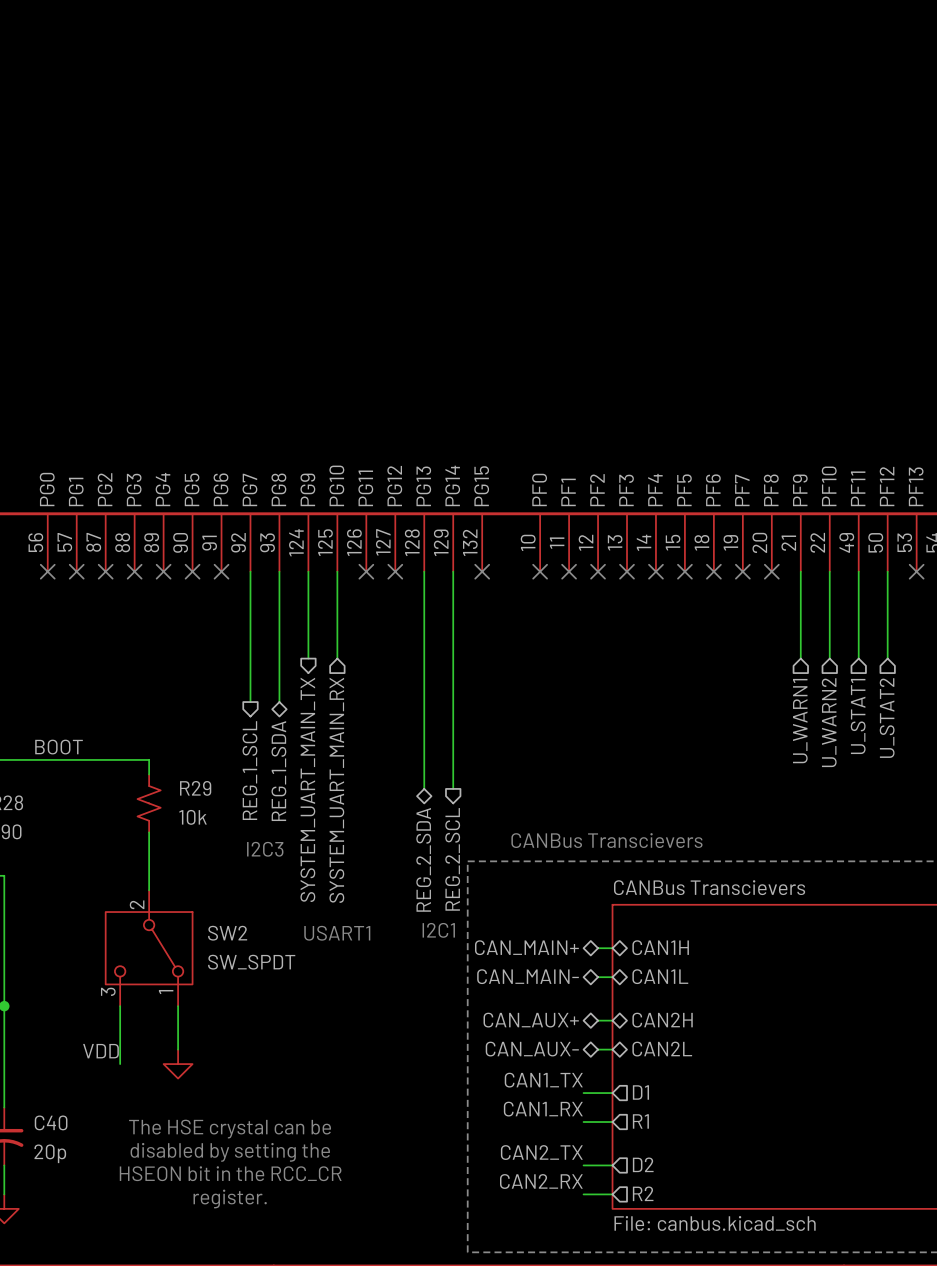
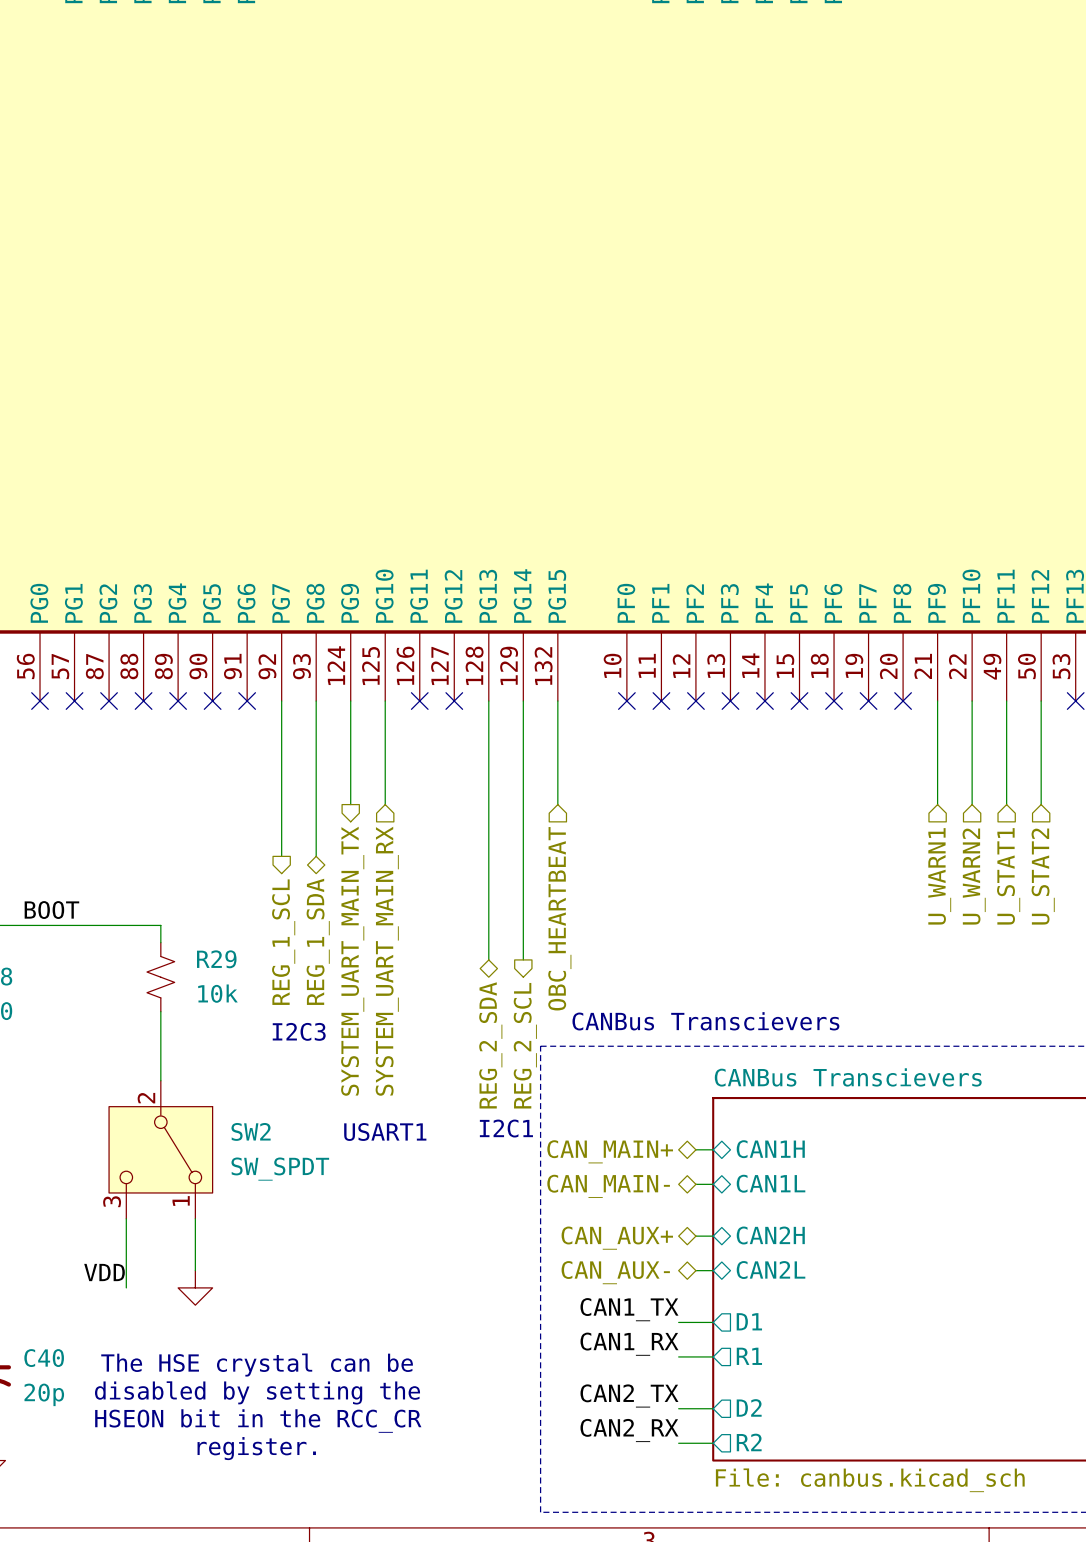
wire: none -> (557, 701) (557, 804)
no-connect mark: (482, 571) -> none
hierarchical label: none -> OBC_HEARTBEAT (559, 918)

